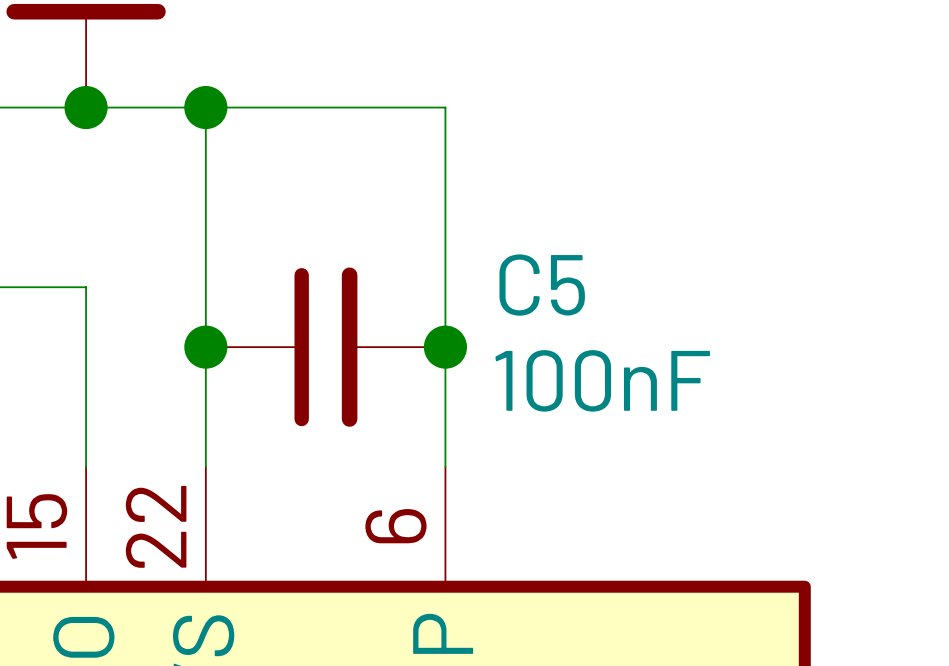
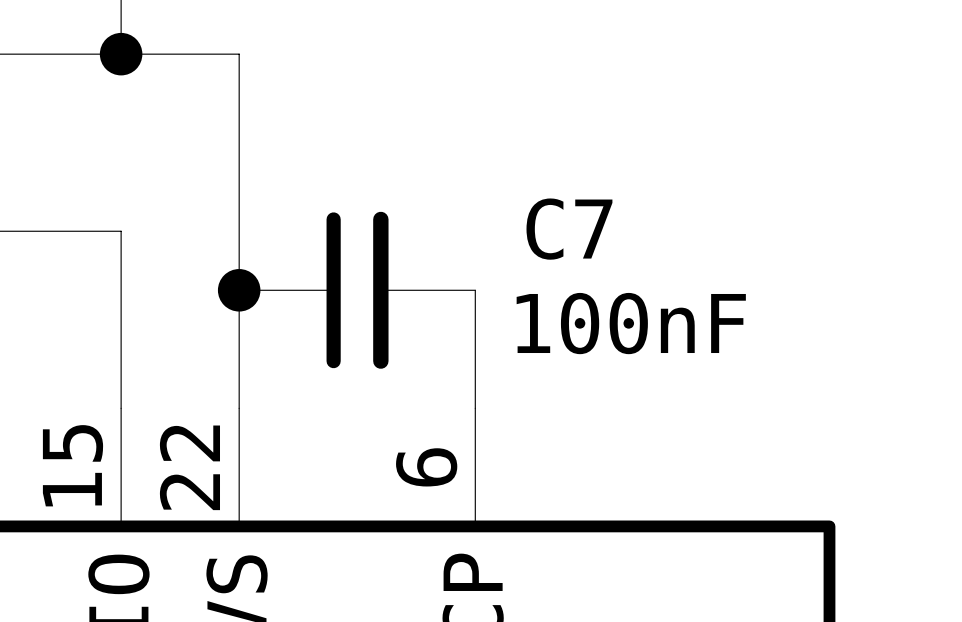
wire: (205, 107) (445, 107) (445, 347) -> none
junction: (205, 107) -> none
C5 name: C5 (542, 285) -> C7 (569, 229)
junction: (445, 347) -> none

